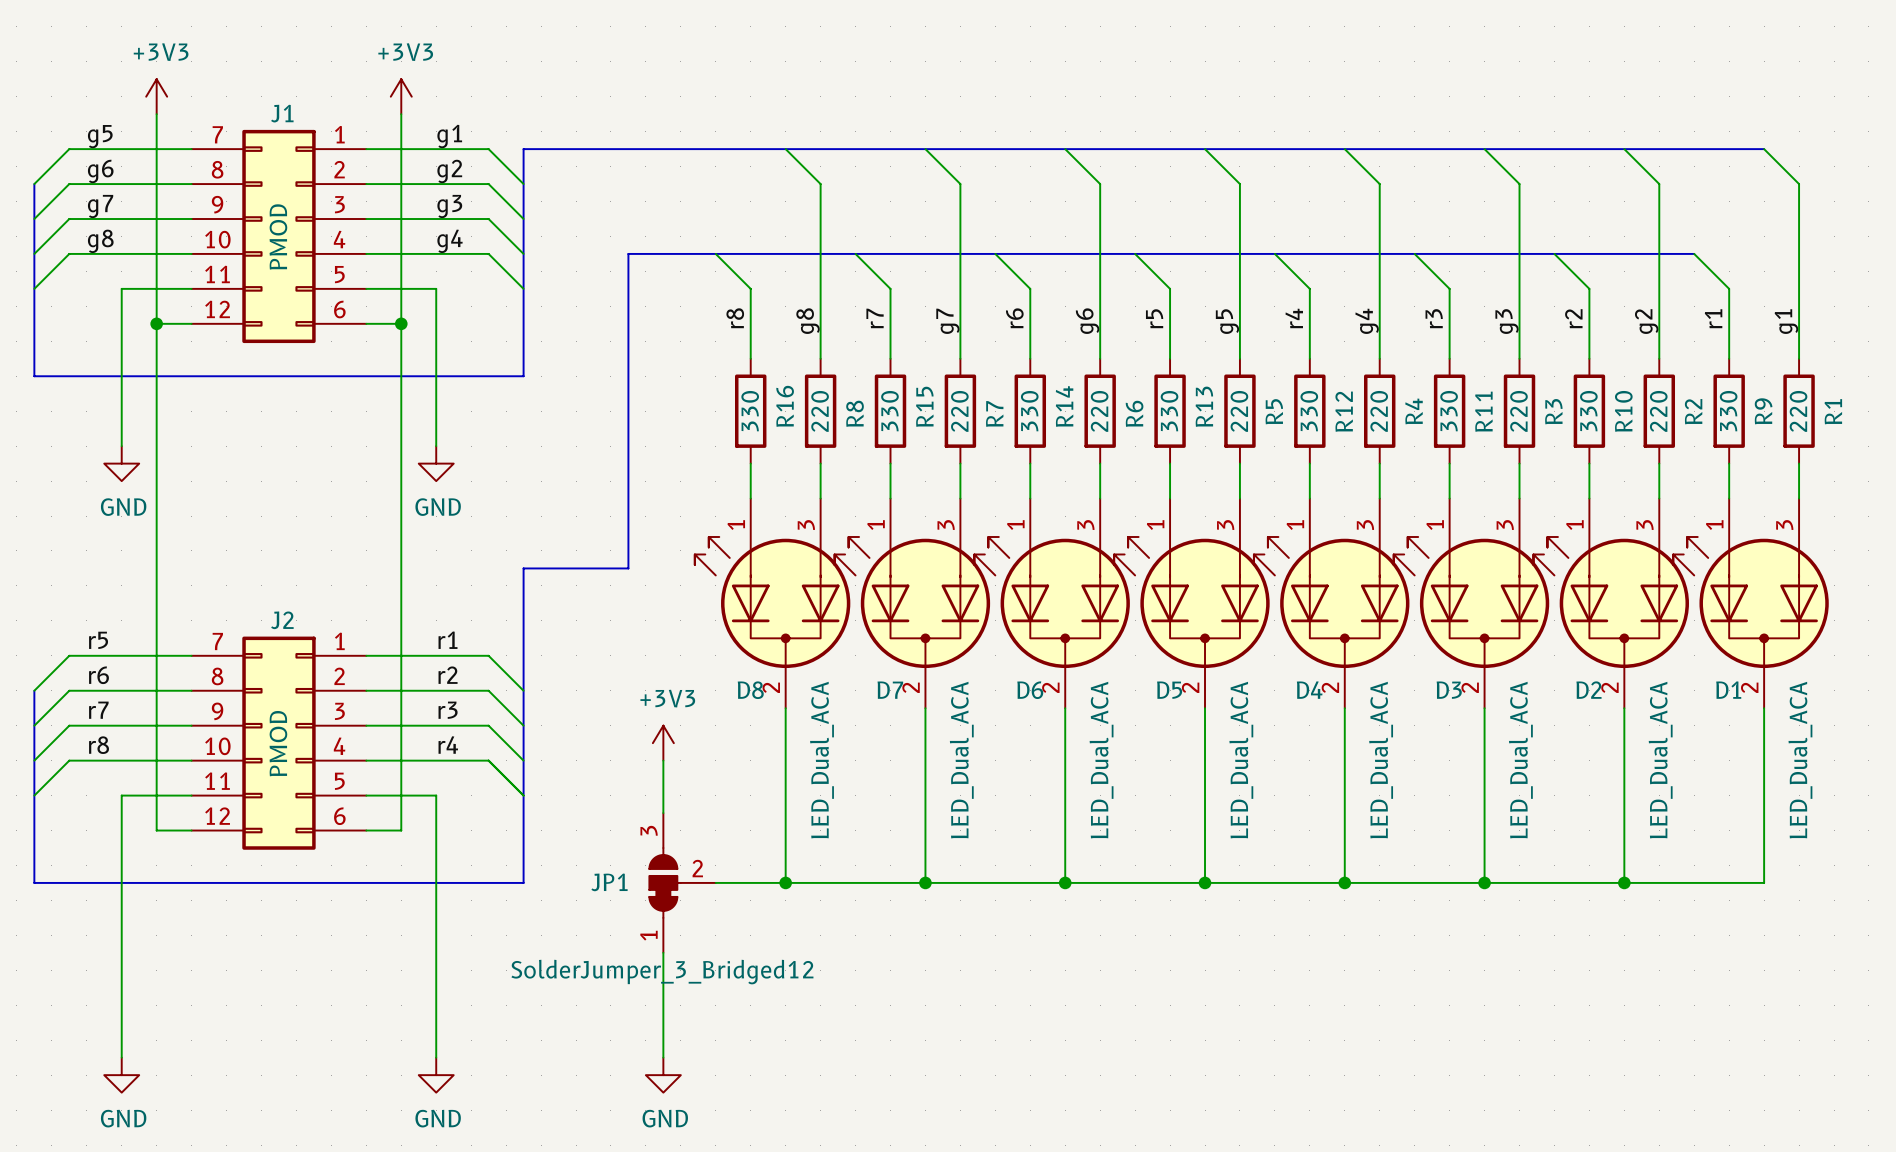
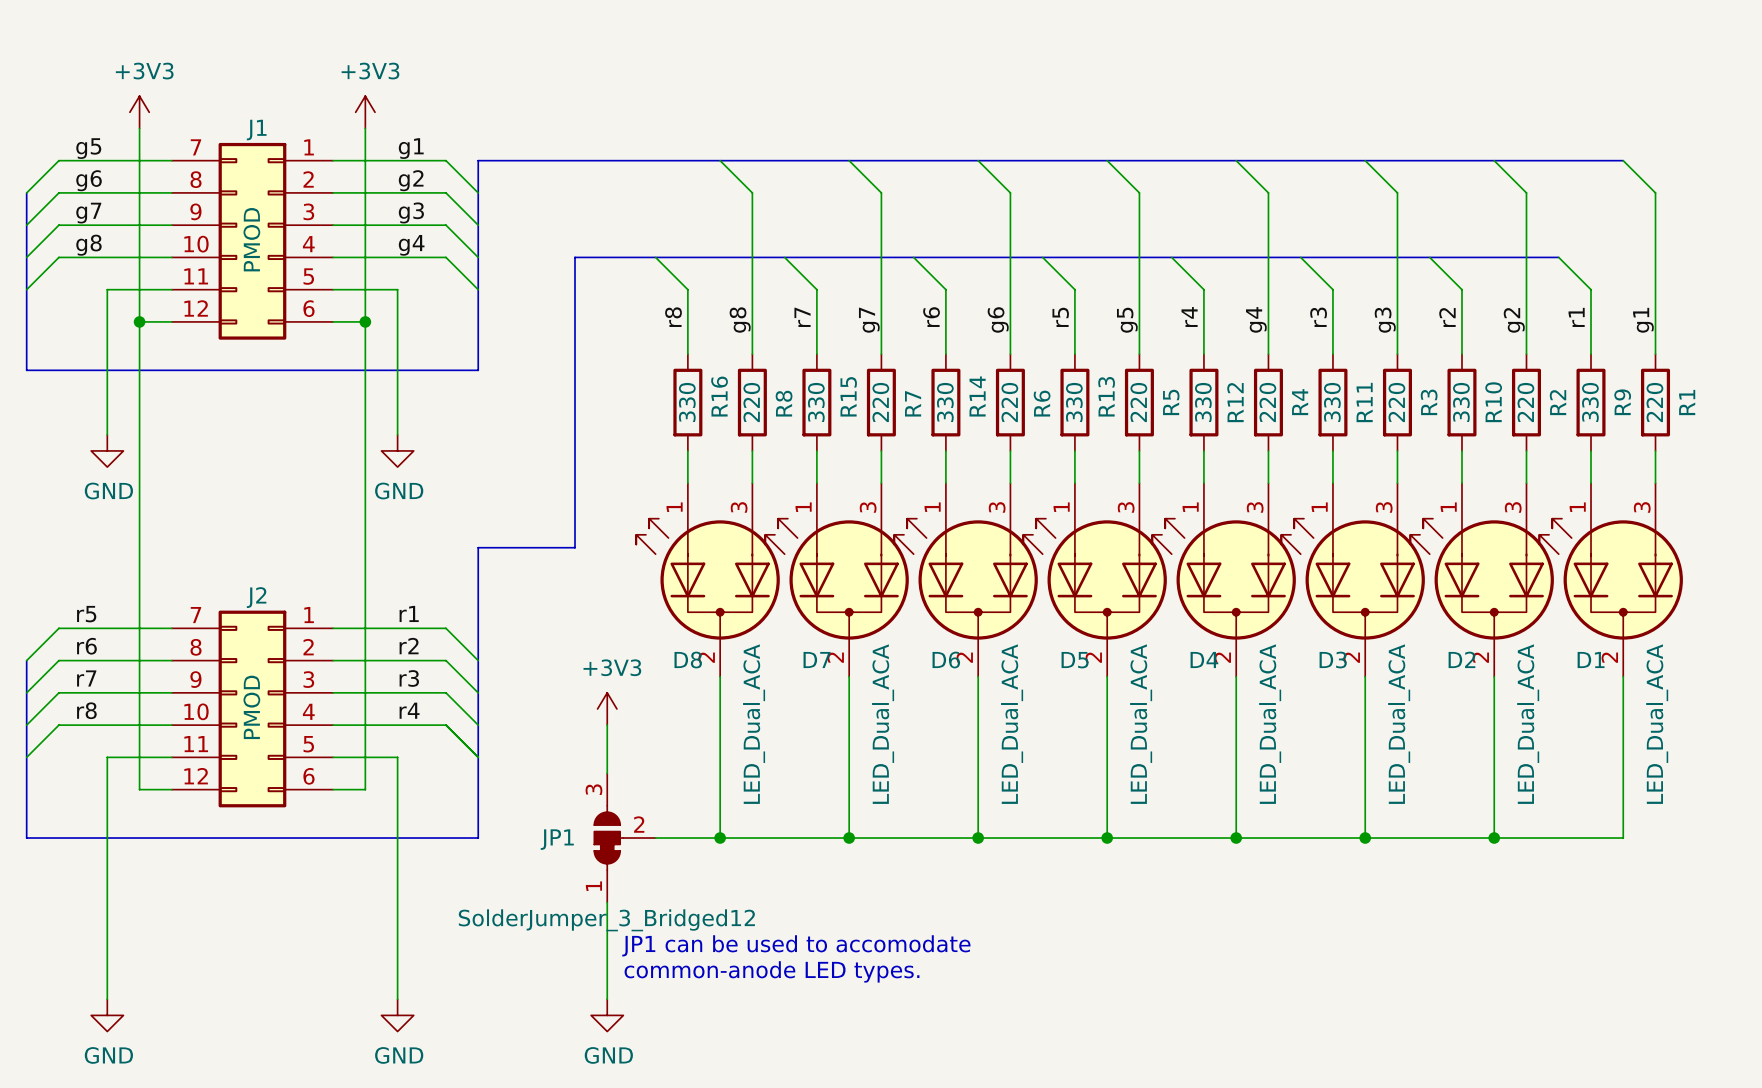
text: none -> JP1 can be used to accomodate (796, 945)
text: none -> common-anode LED types. (772, 971)

